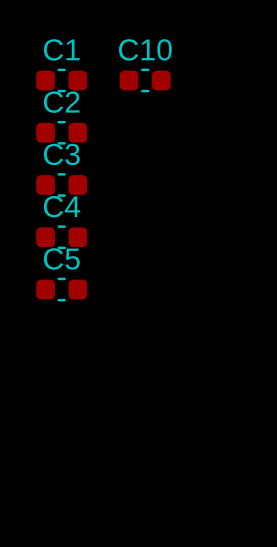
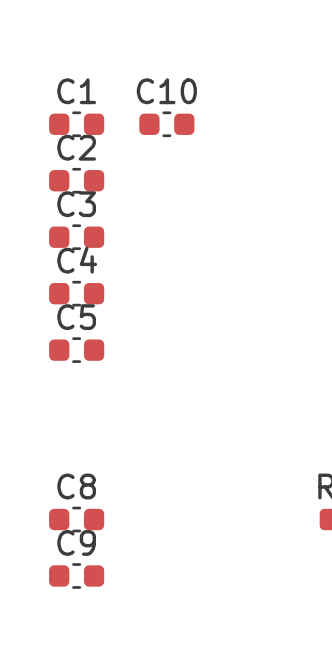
C8: none -> (76, 519)
C9: none -> (76, 575)

